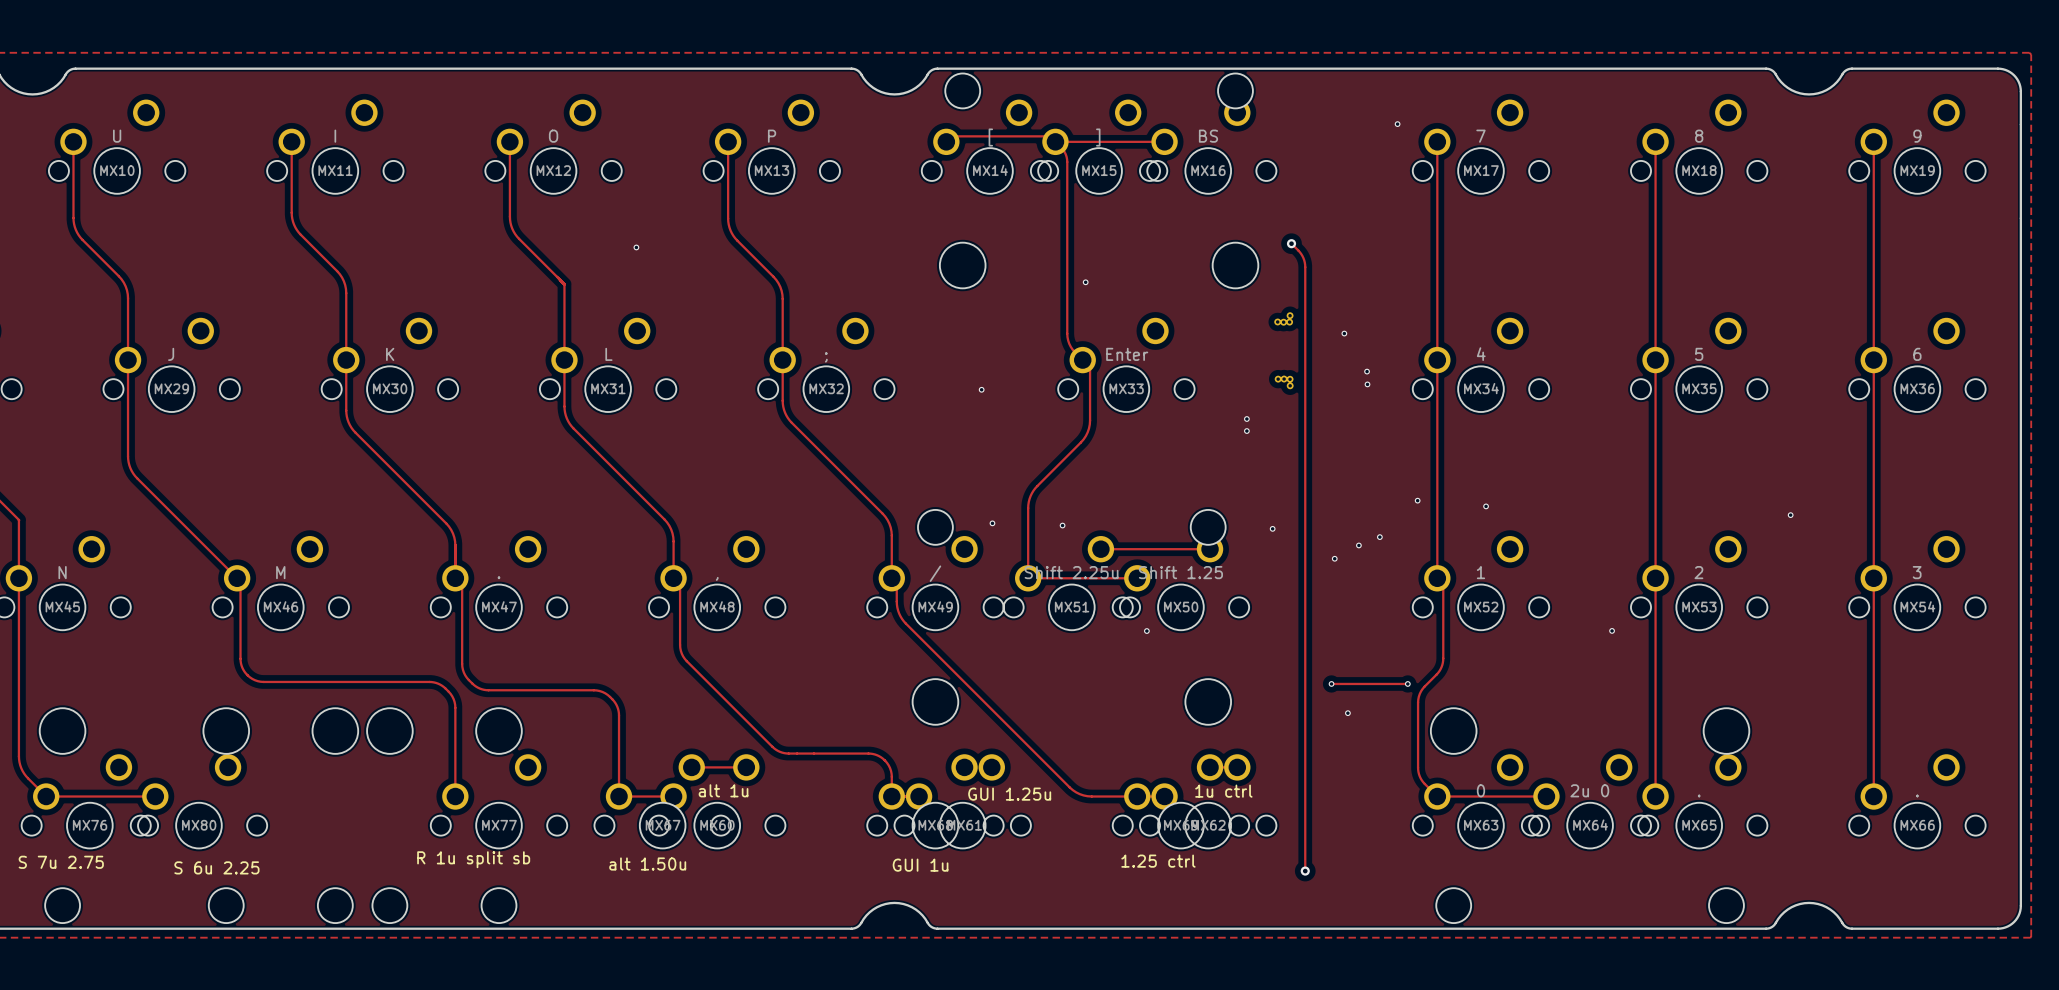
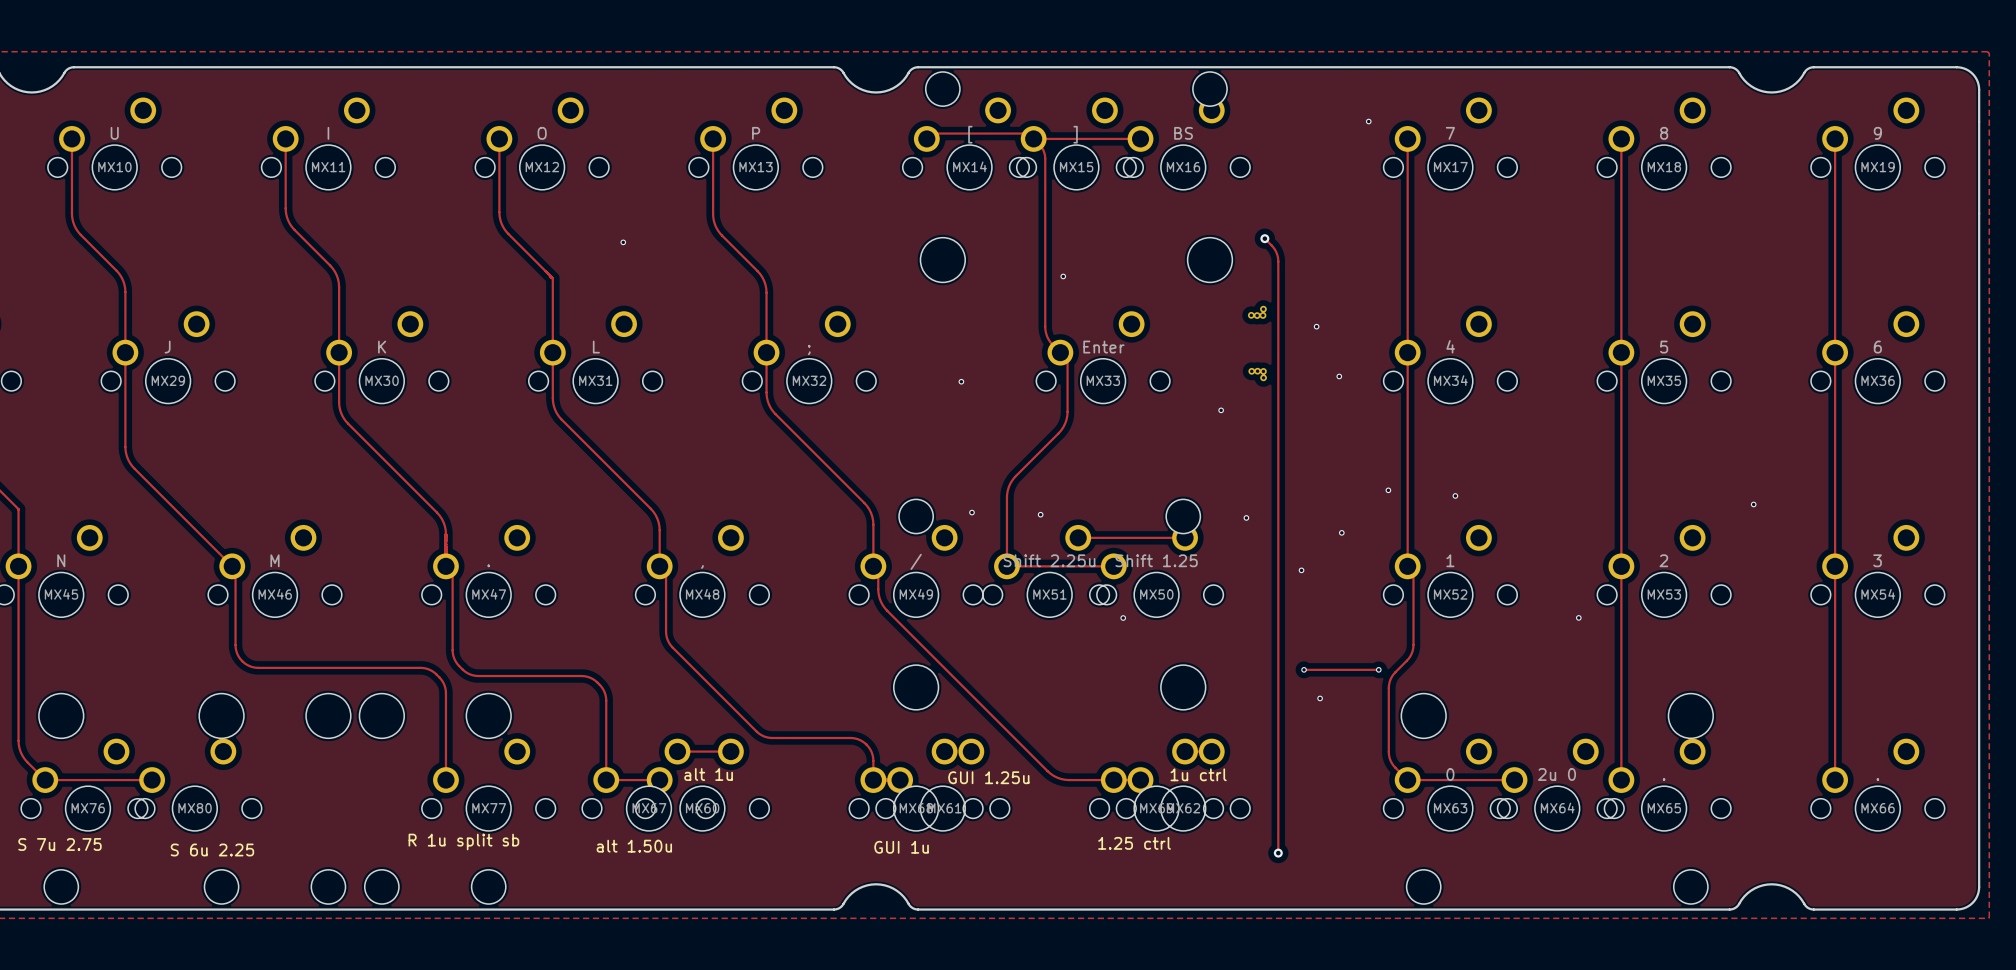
via: (1367, 371) -> none
via: (1246, 431) -> none
via: (1379, 537) -> none
via: none -> (1341, 532)
via: (1358, 545) -> none
via: (1334, 558) -> none
via: none -> (1301, 570)

